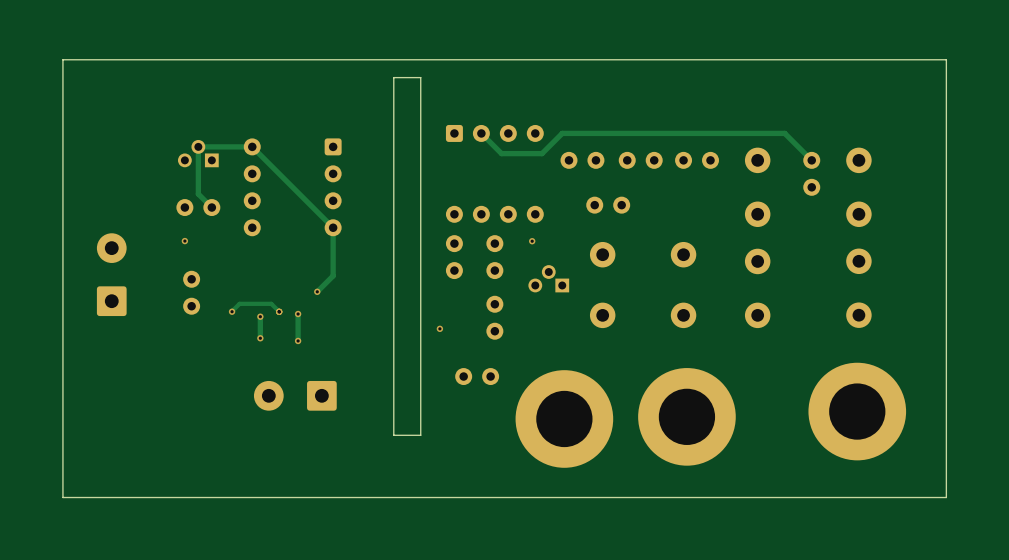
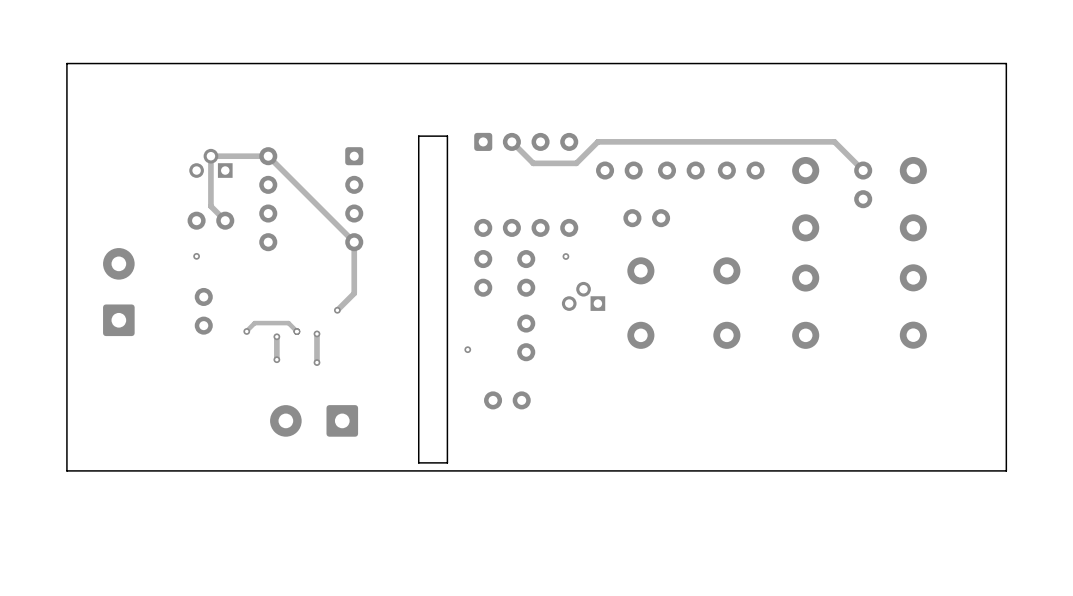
board edge: (420, 128) (420, 77) (393, 77) (393, 128) -> (447, 136) (418, 136)
part: (857, 411) -> none
part: (686, 416) -> none
part: (564, 418) -> none
board edge: (946, 442) (946, 497) (62, 497) (62, 442) -> (1006, 470) (66, 470)

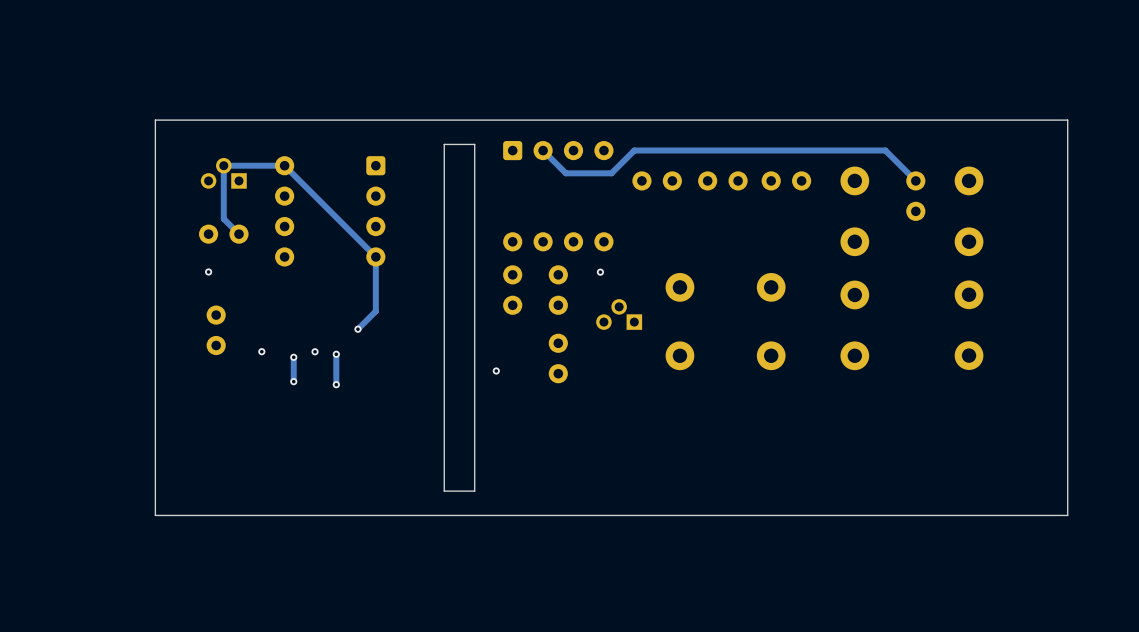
board edge: (1006, 113) (1006, 63) (66, 63) (66, 470) (1006, 470) -> (1067, 120) (155, 120) (155, 515) (1067, 515) (1067, 499)
part: (646, 218) -> none
part: (118, 292) -> none
track: (296, 331) (288, 323) (254, 323) (246, 331) -> none
part: (507, 400) -> none
part: (314, 420) -> none

